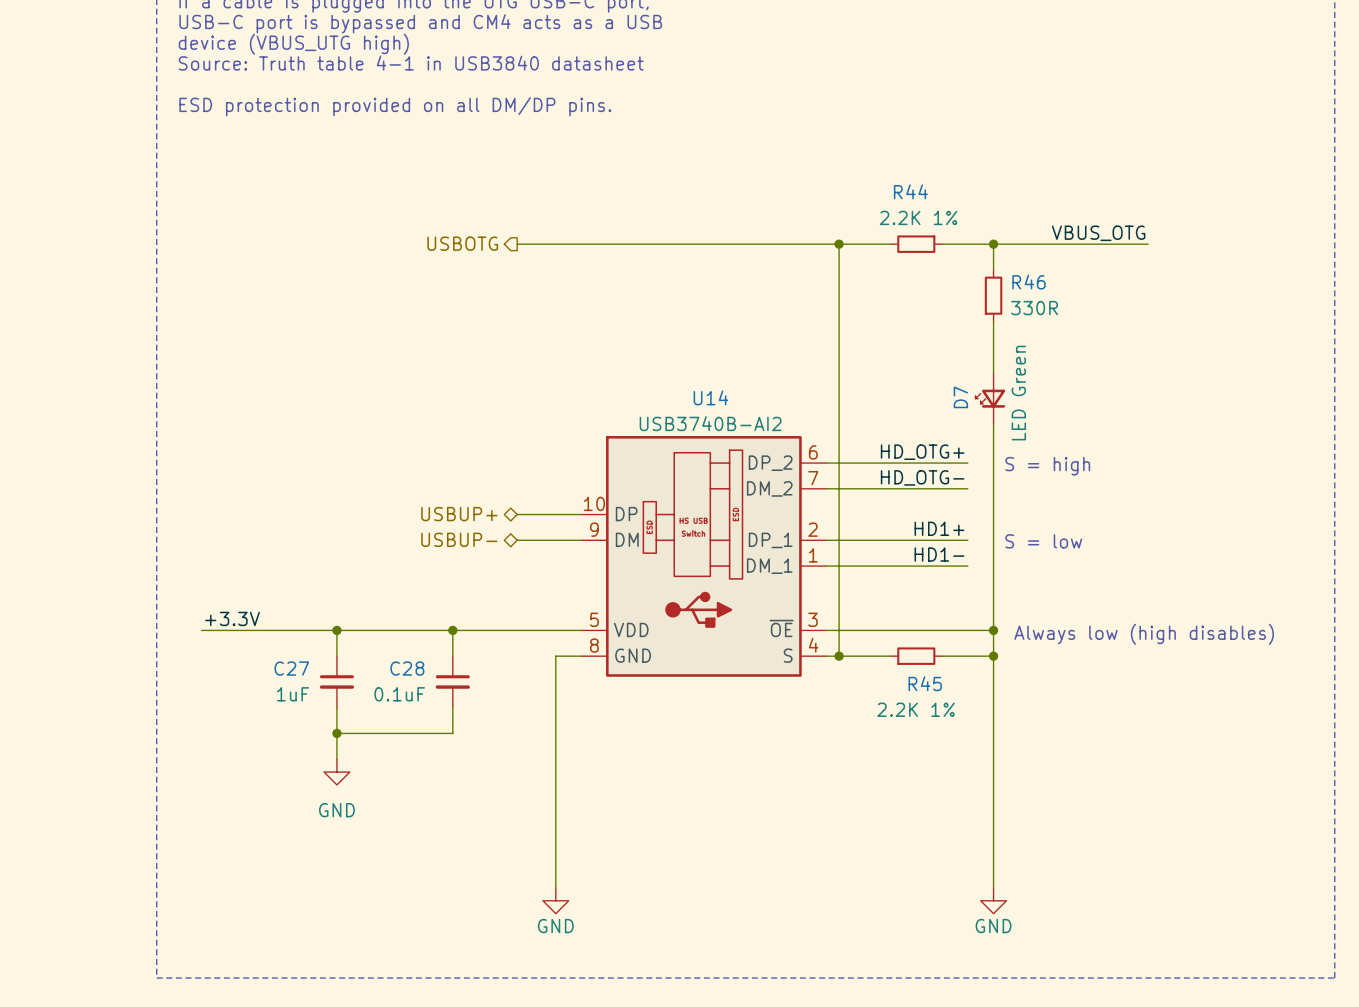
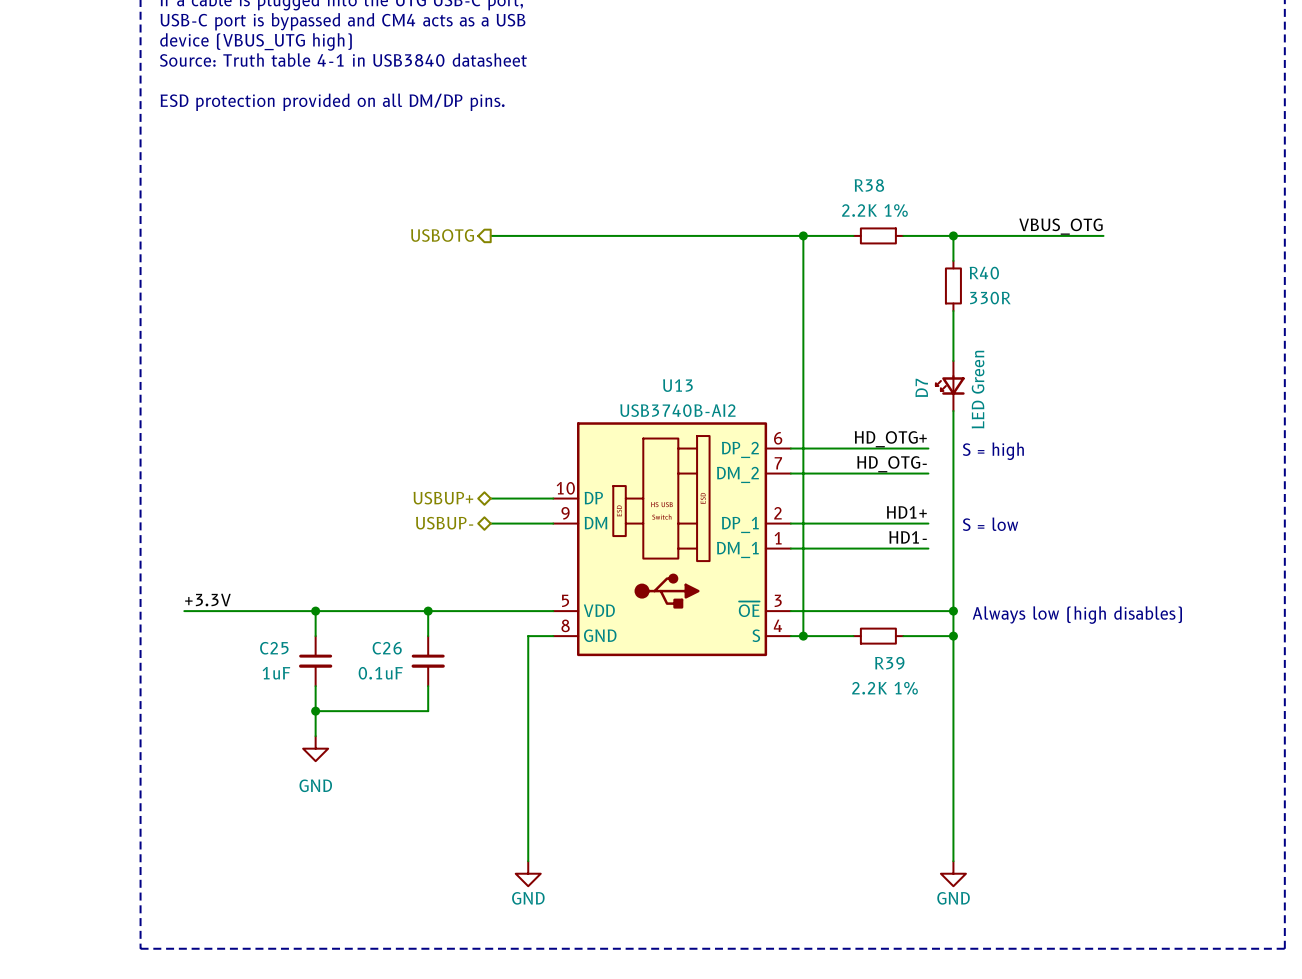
R44 name: R44 (910, 191) -> R38 (869, 185)
R46 name: R46 (1029, 282) -> R40 (984, 273)
U14 name: U14 (710, 397) -> U13 (677, 385)
C27 name: C27 (291, 668) -> C25 (274, 648)
C28 name: C28 (407, 668) -> C26 (387, 648)
R45 name: R45 (925, 683) -> R39 (889, 663)

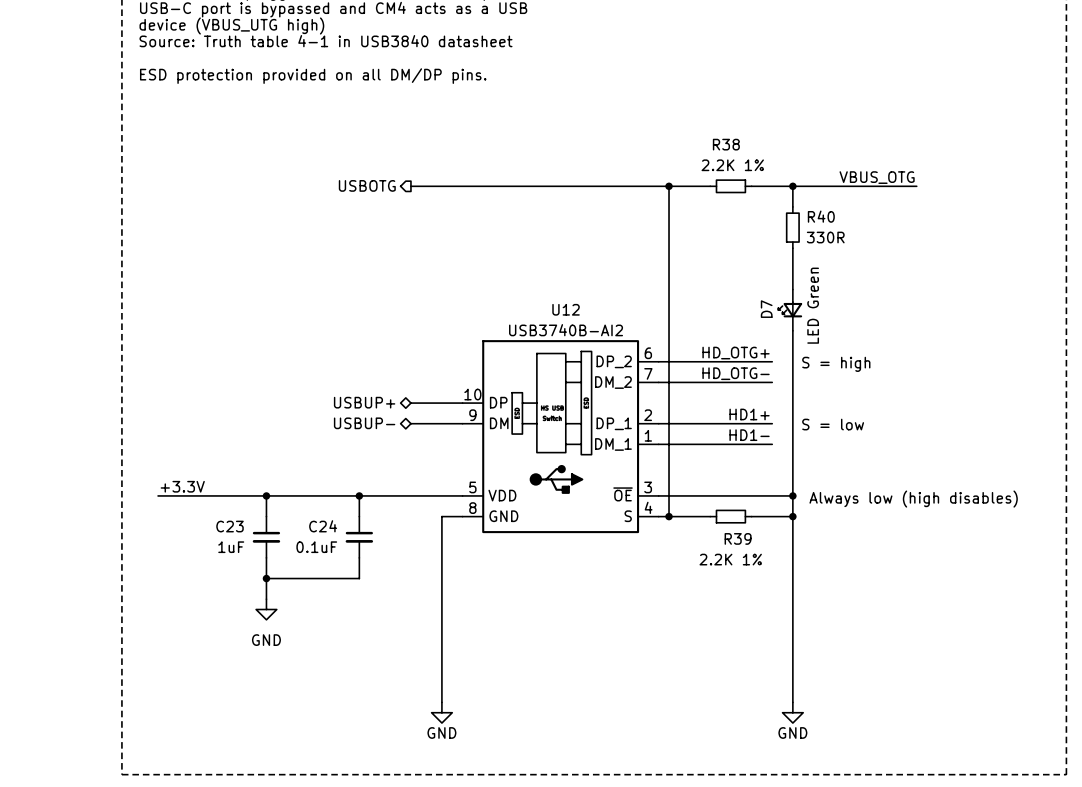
U13 name: U13 (677, 385) -> U12 (566, 309)
C25 name: C25 (274, 648) -> C23 (230, 526)
C26 name: C26 (387, 648) -> C24 (323, 526)

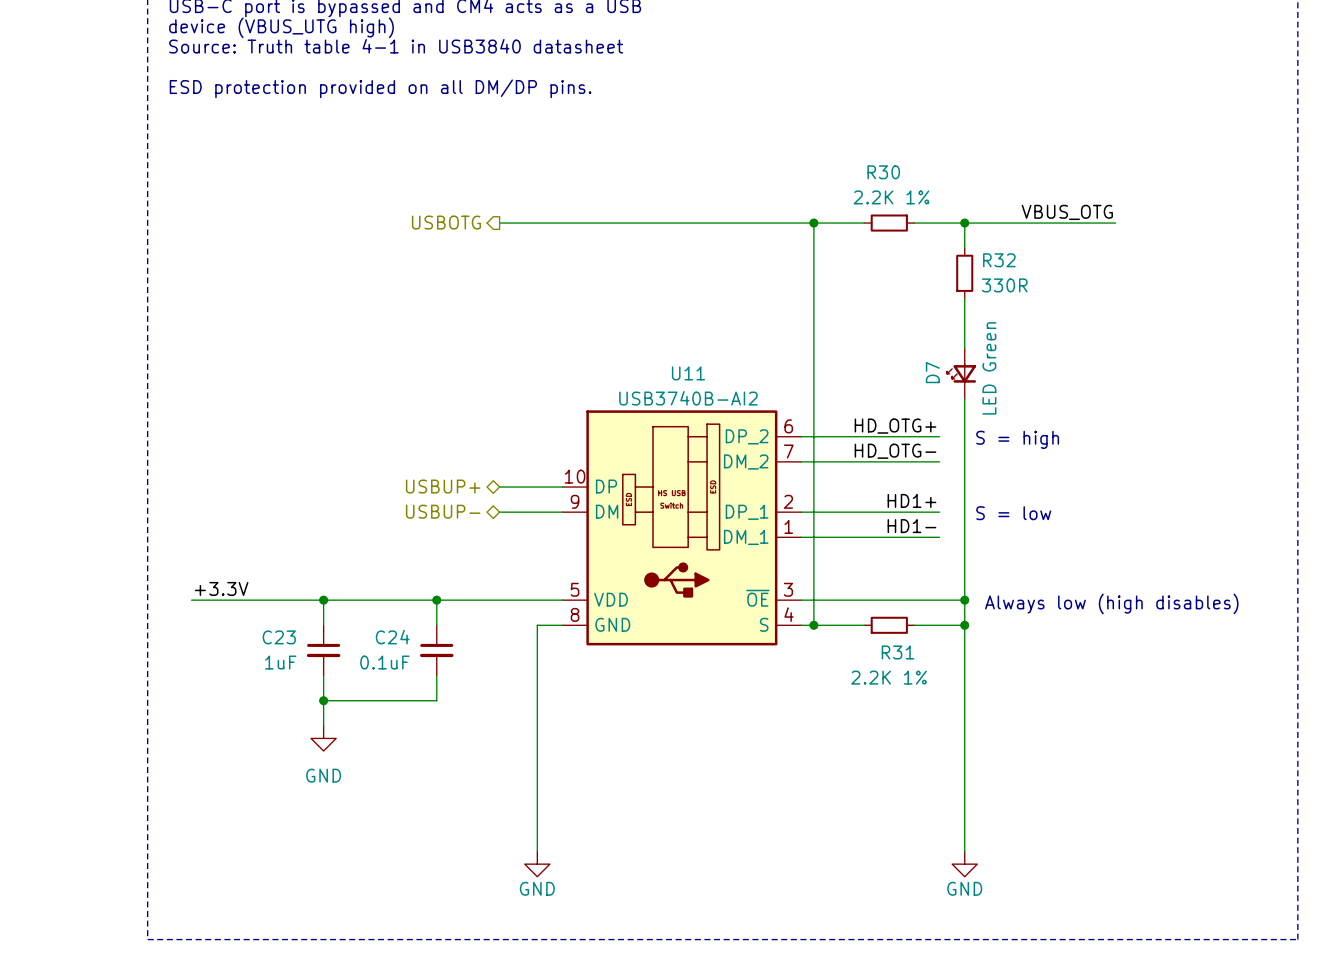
R38 name: R38 (726, 144) -> R30 (883, 172)
R40 name: R40 (821, 216) -> R32 (999, 260)
U12 name: U12 (566, 309) -> U11 (688, 373)
R39 name: R39 (738, 538) -> R31 (898, 652)

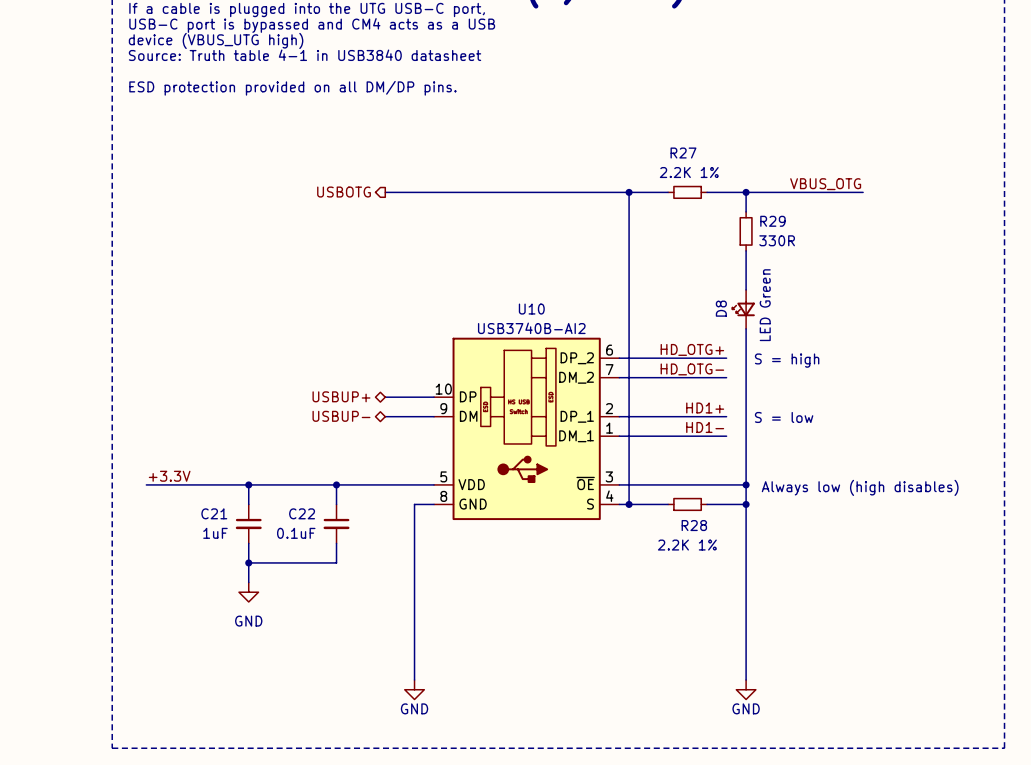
R30 name: R30 (883, 172) -> R27 (683, 153)
R32 name: R32 (999, 260) -> R29 (772, 221)
D7 name: D7 (932, 372) -> D8 (721, 308)
U11 name: U11 (688, 373) -> U10 (531, 309)
C23 name: C23 (279, 637) -> C21 (214, 513)
C24 name: C24 (392, 637) -> C22 (302, 513)
R31 name: R31 (898, 652) -> R28 (694, 525)

